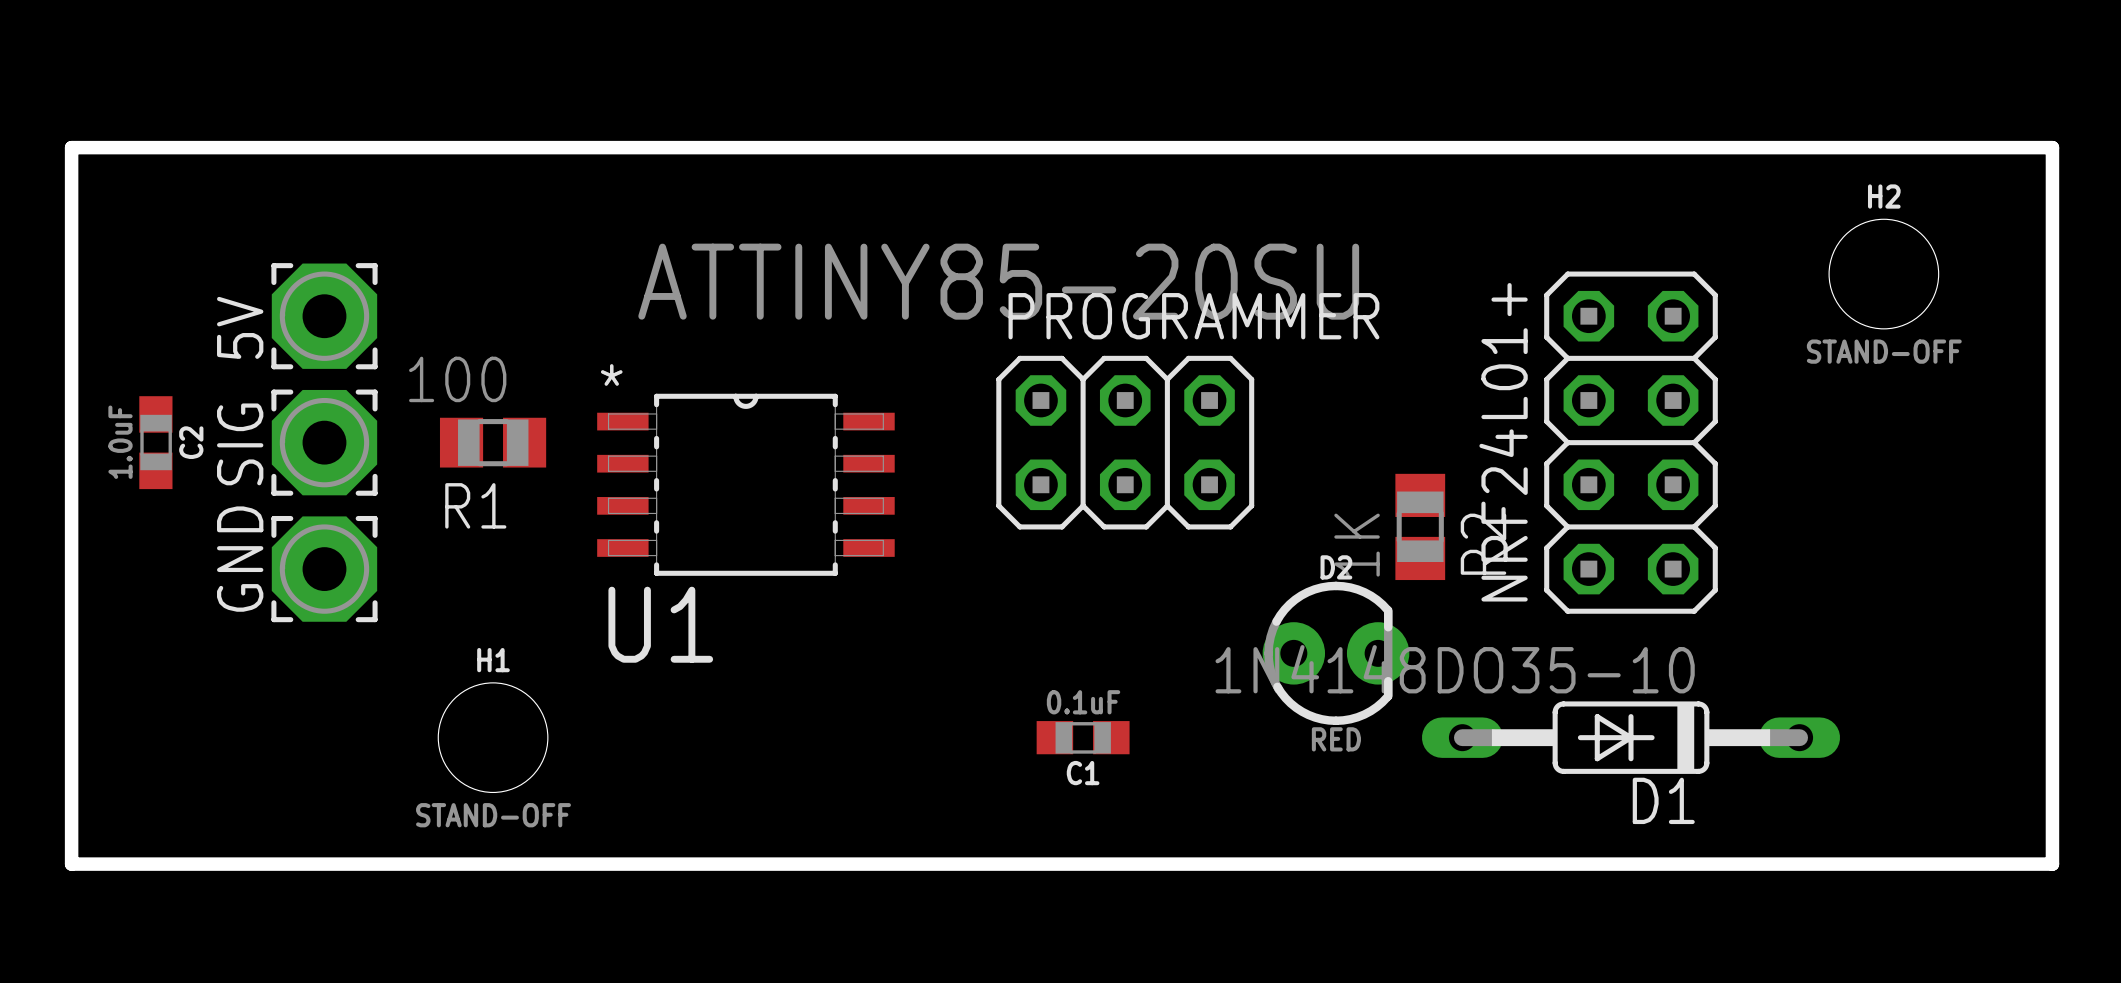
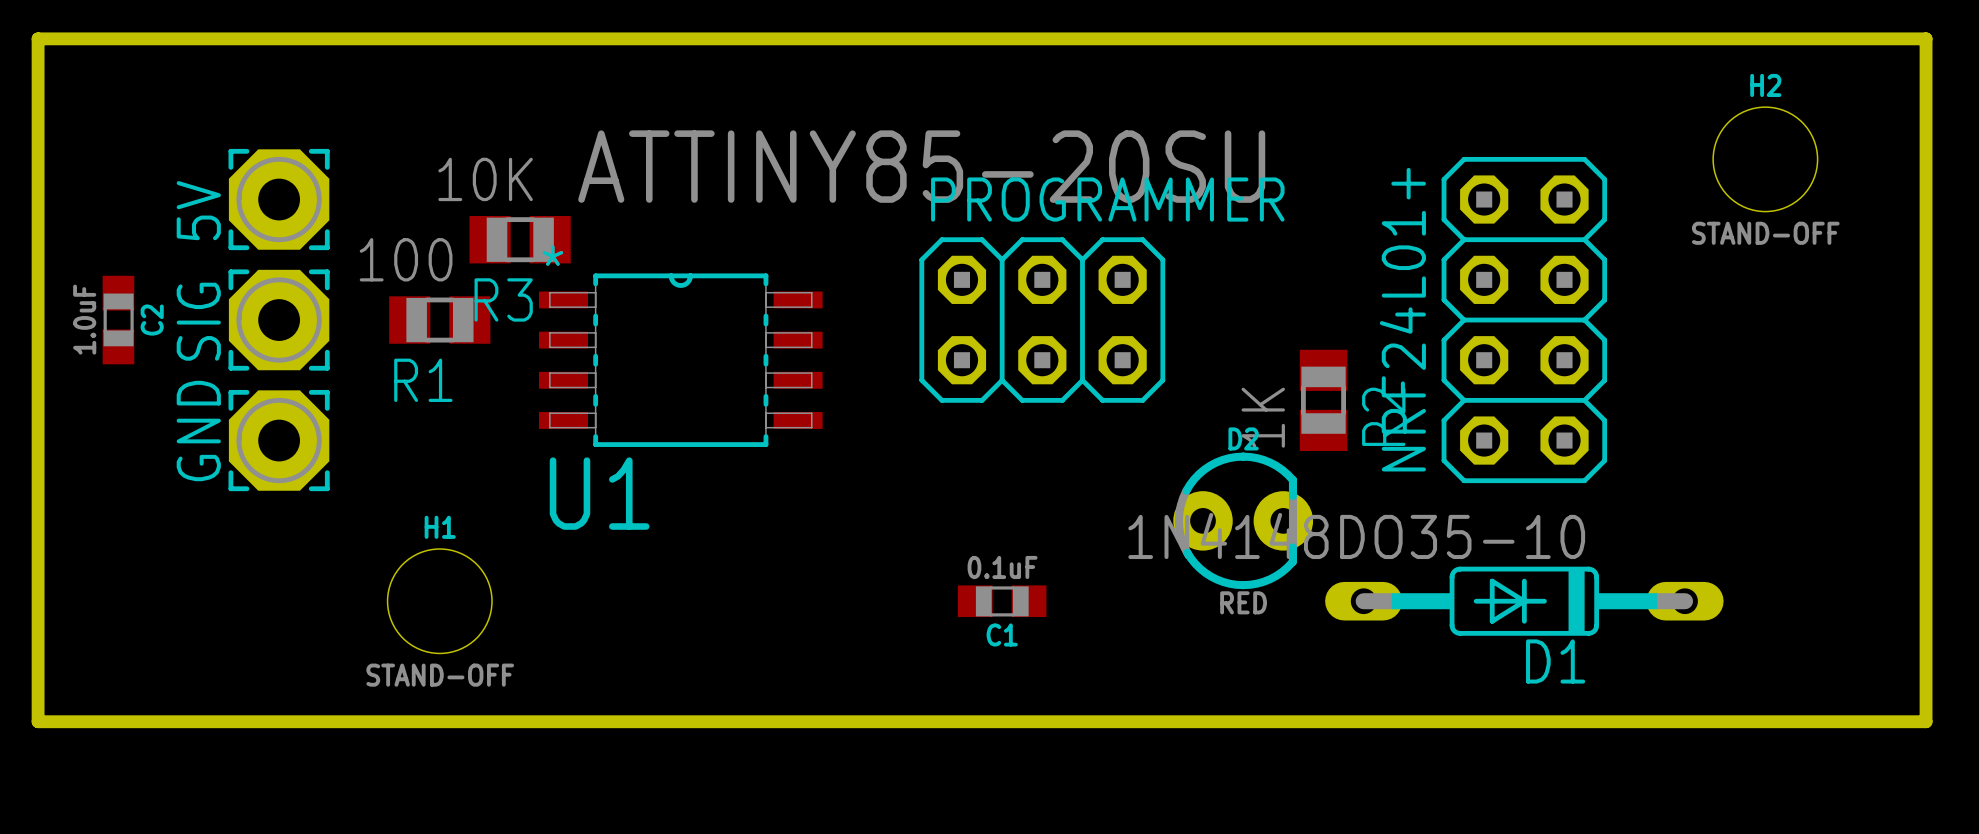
R3: none -> 10K (520, 239)

